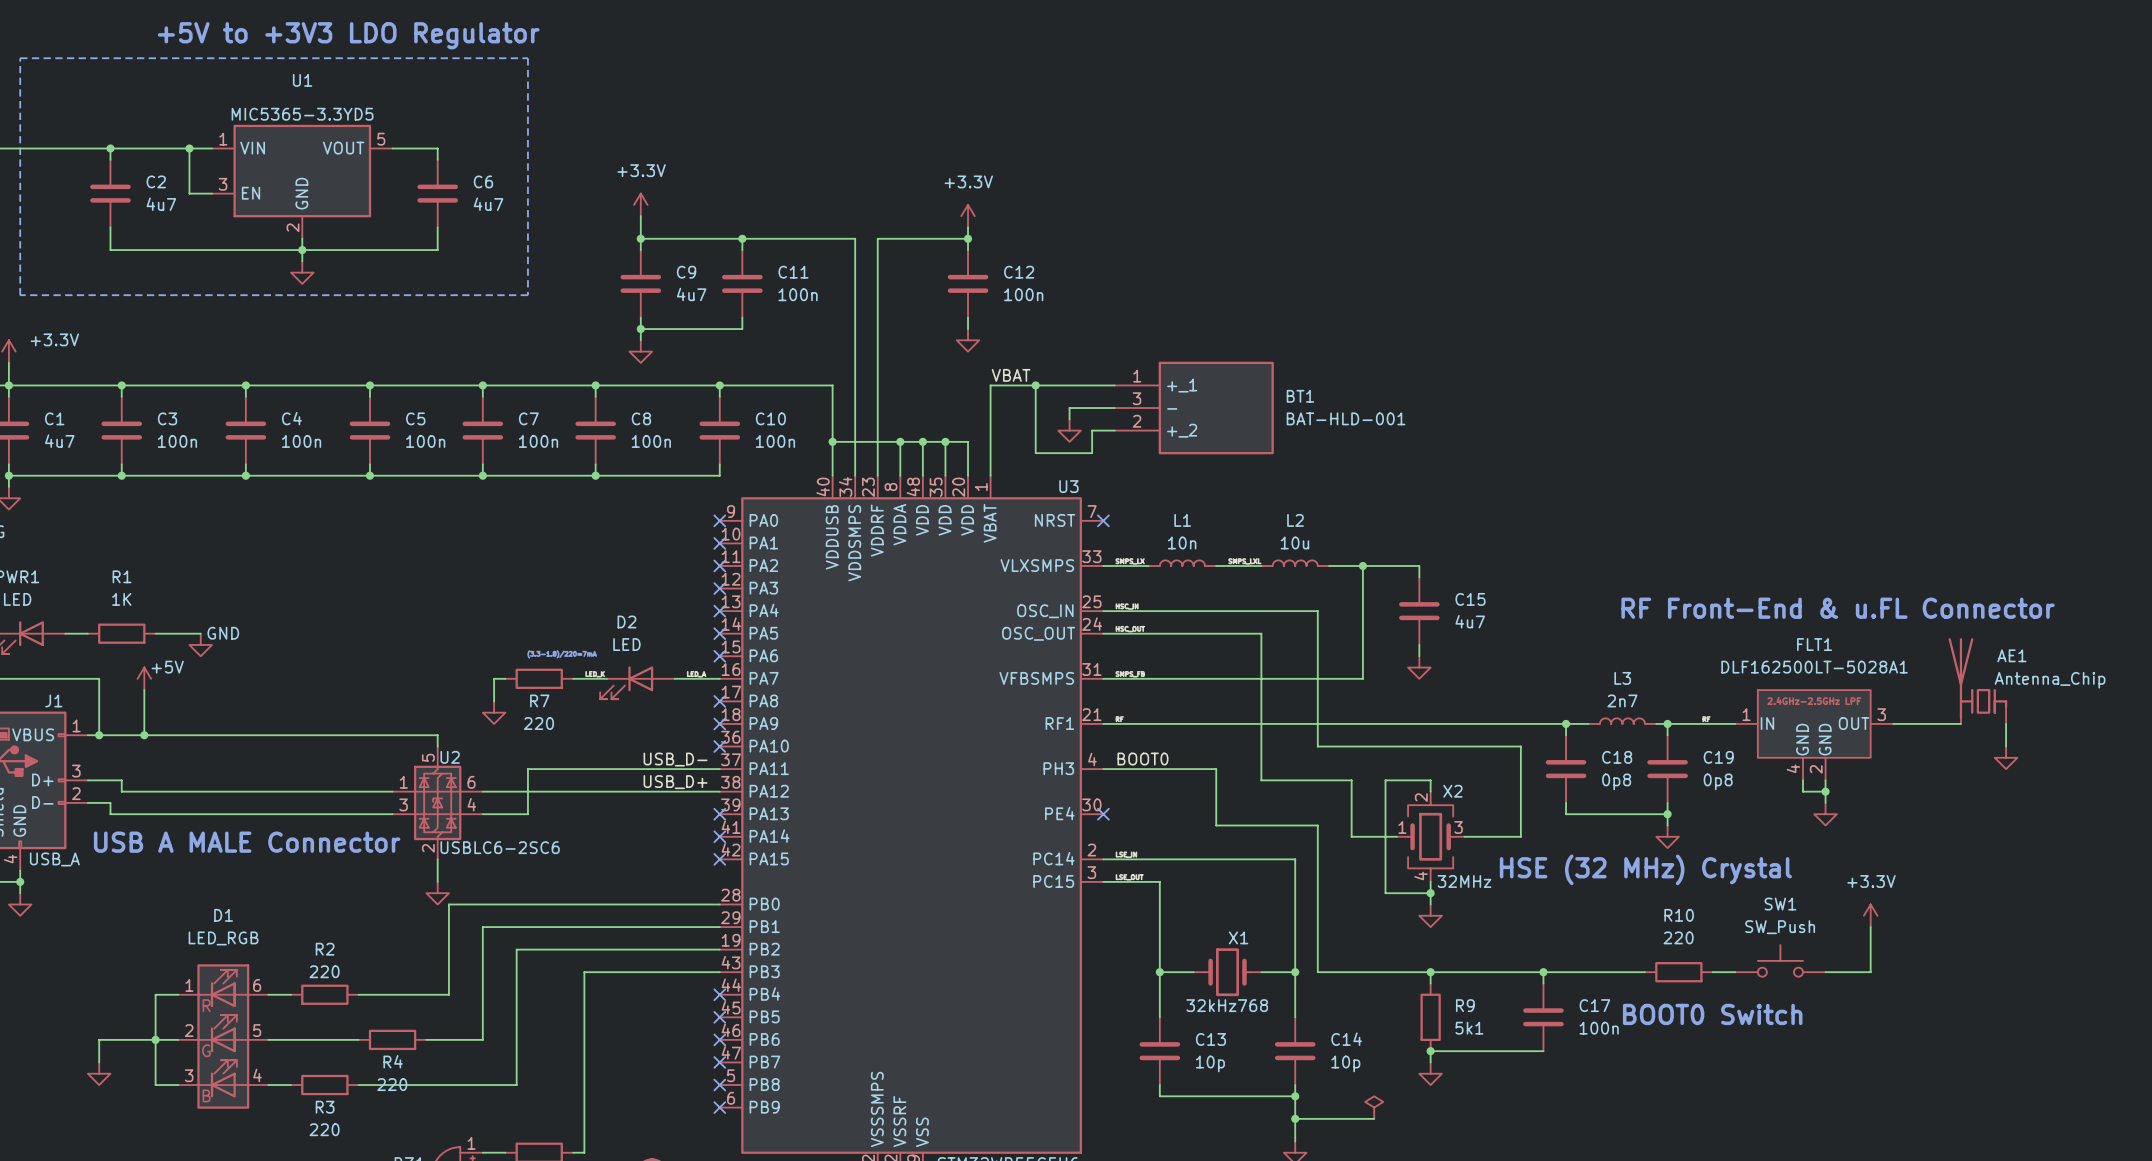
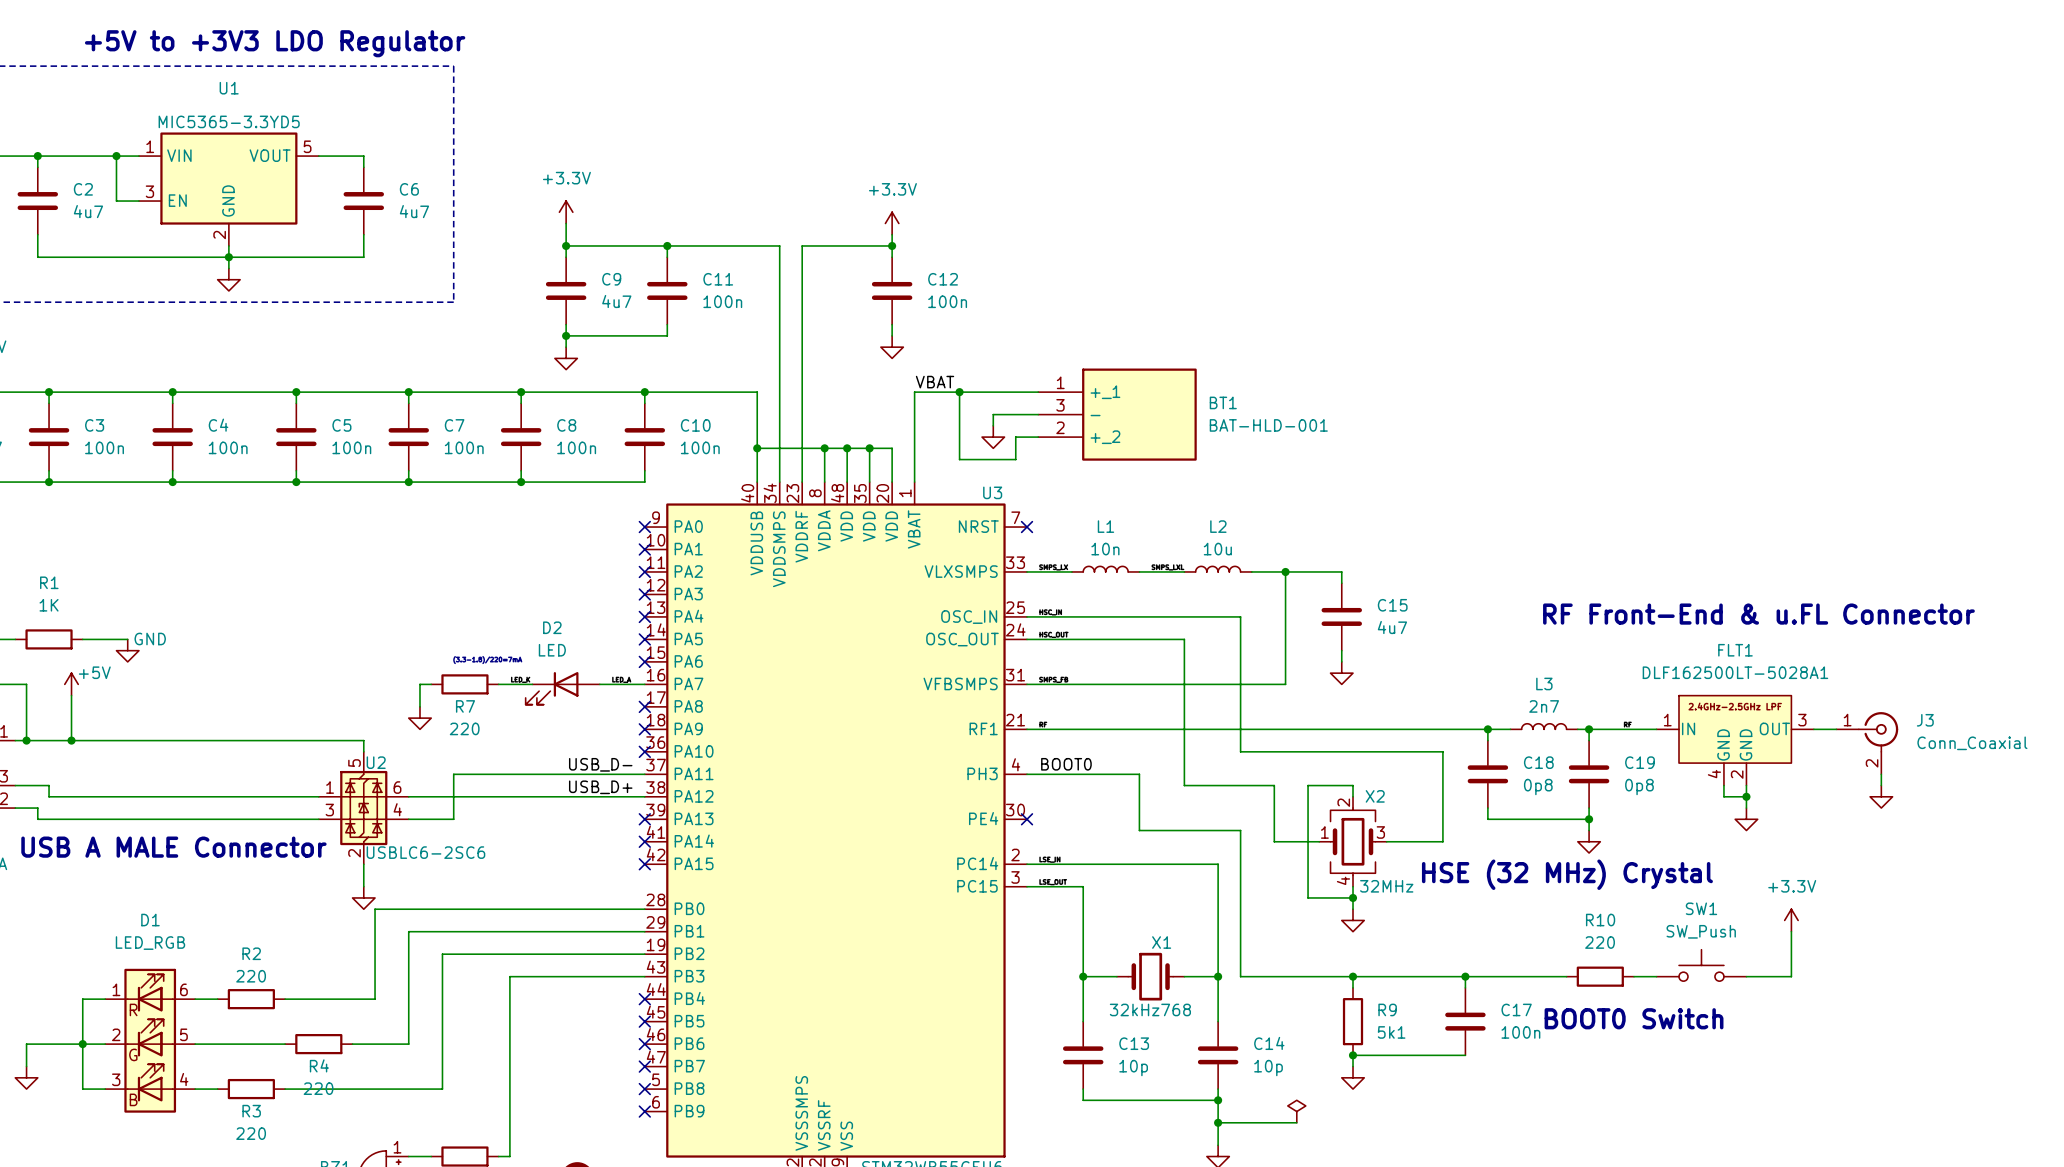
AE1: Antenna_Chip (1977, 681) -> none
wire: (2006, 723) (2006, 746) -> none
J3: none -> Conn_Coaxial (1867, 743)
power symbol position: (2006, 757) -> (1881, 796)
wire: none -> (1881, 774) (1881, 785)

